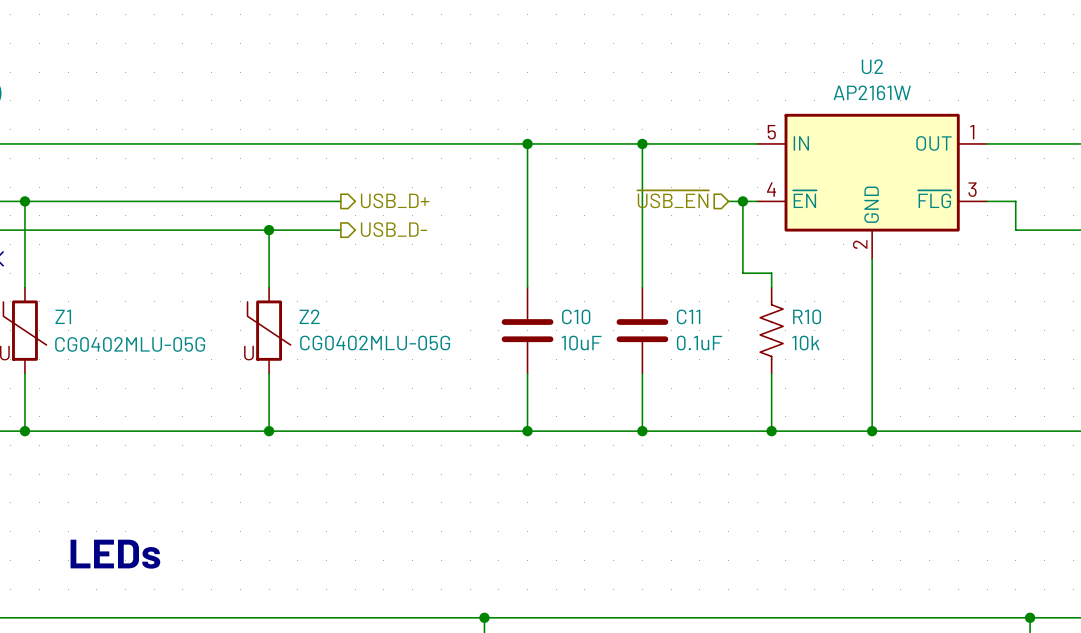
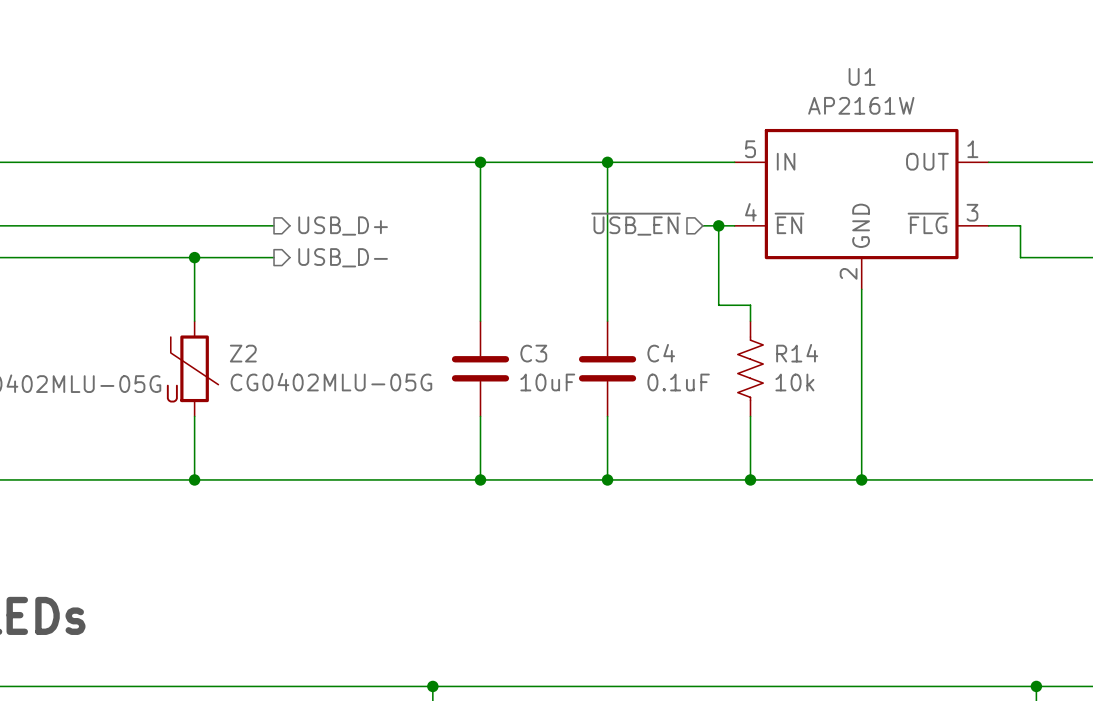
U2 name: U2 (872, 66) -> U1 (862, 76)
C10 name: C10 (576, 316) -> C3 (533, 353)
C11 name: C11 (688, 316) -> C4 (661, 353)
R10 name: R10 (807, 316) -> R14 (797, 353)

